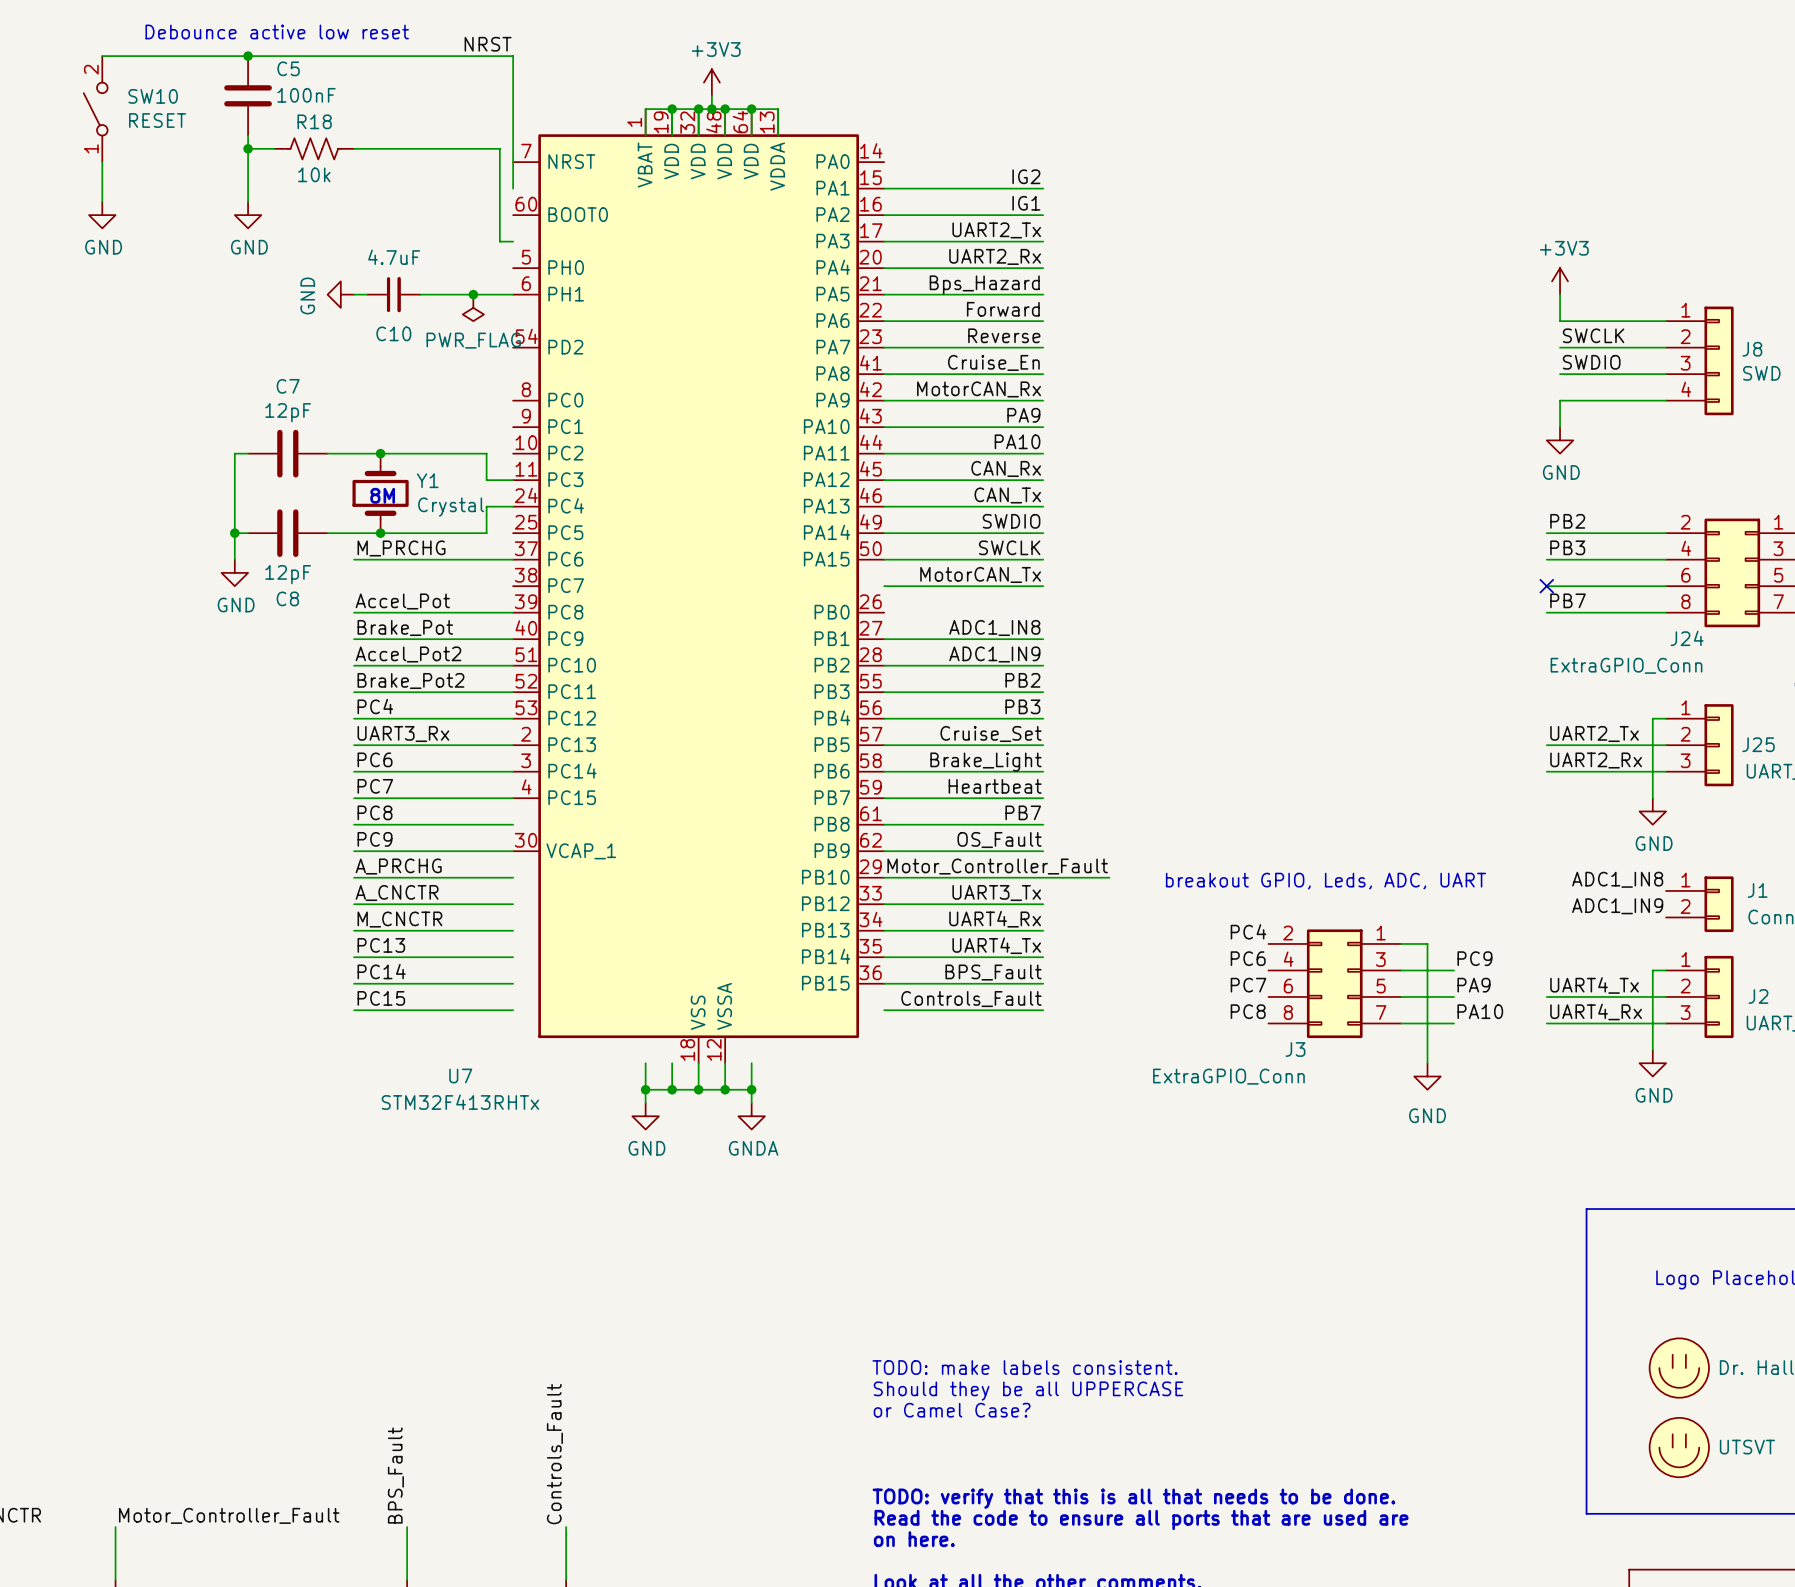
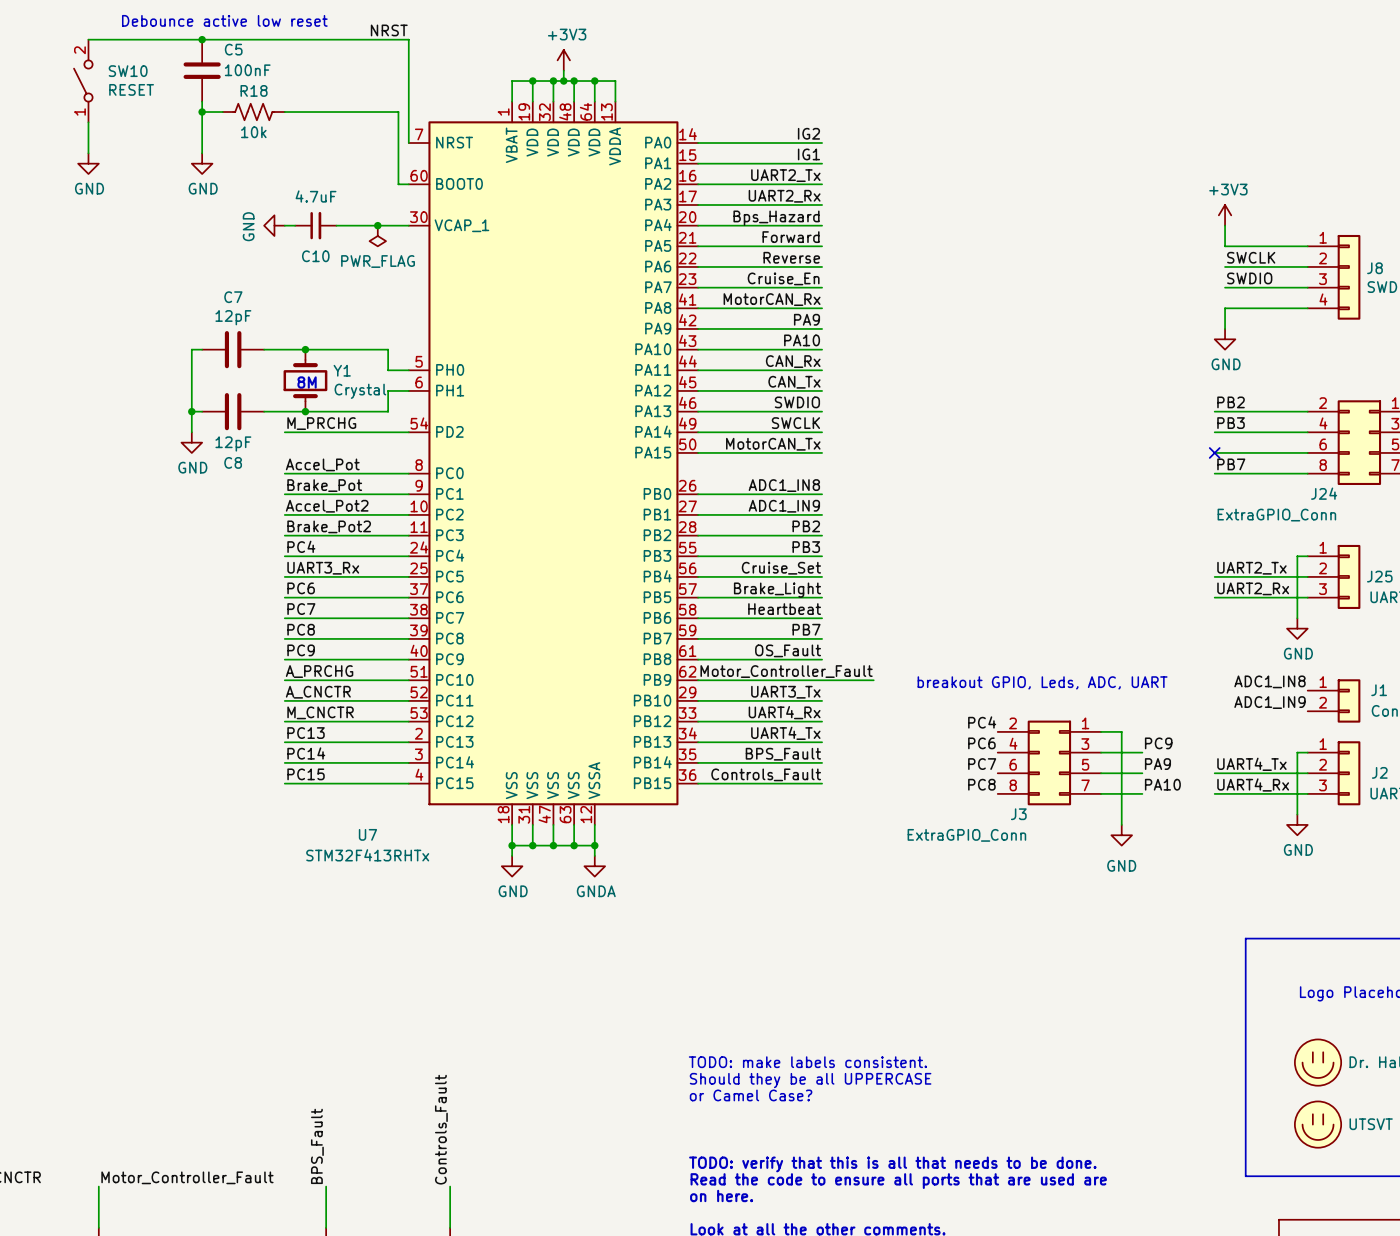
U7 symbol: [513, 109, 885, 1064] -> [408, 101, 699, 825]

